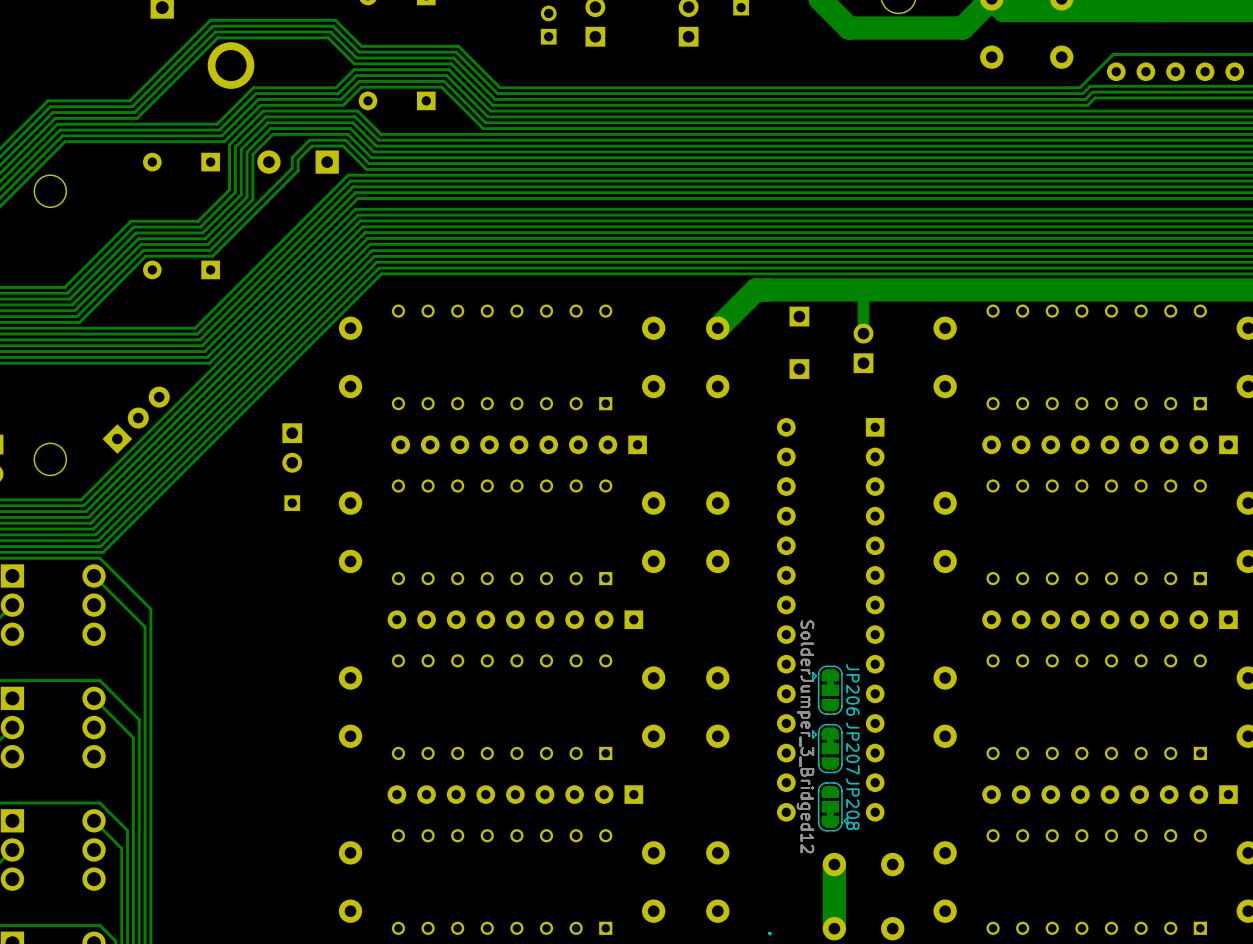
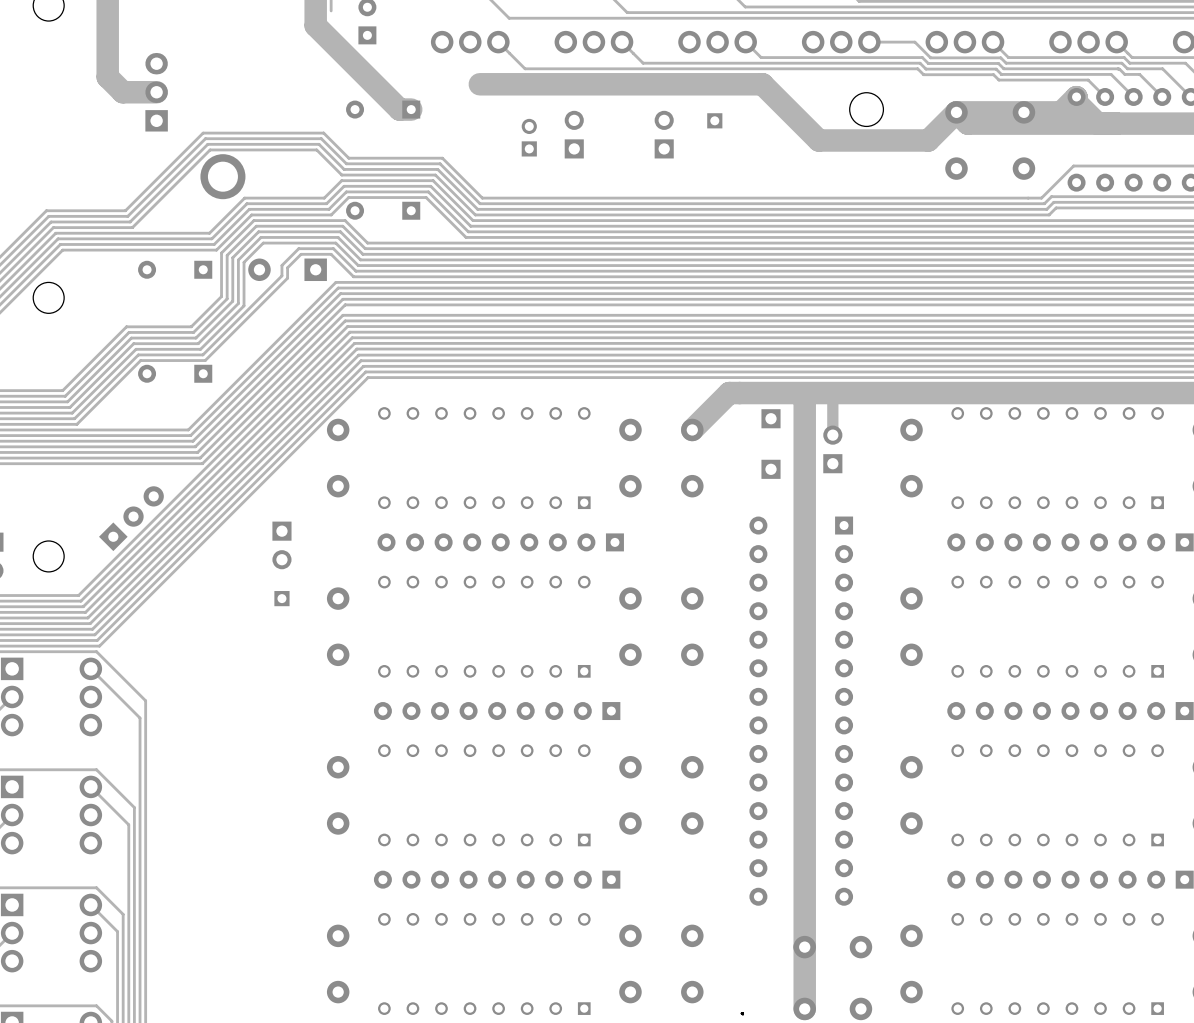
track: none -> (804, 393) (804, 947)
JP206: SolderJumper_3_Bridged12 (827, 690) -> none
JP207: SolderJumper_3_Bridged12 (827, 748) -> none
JP208: SolderJumper_3_Bridged12 (833, 806) -> none

